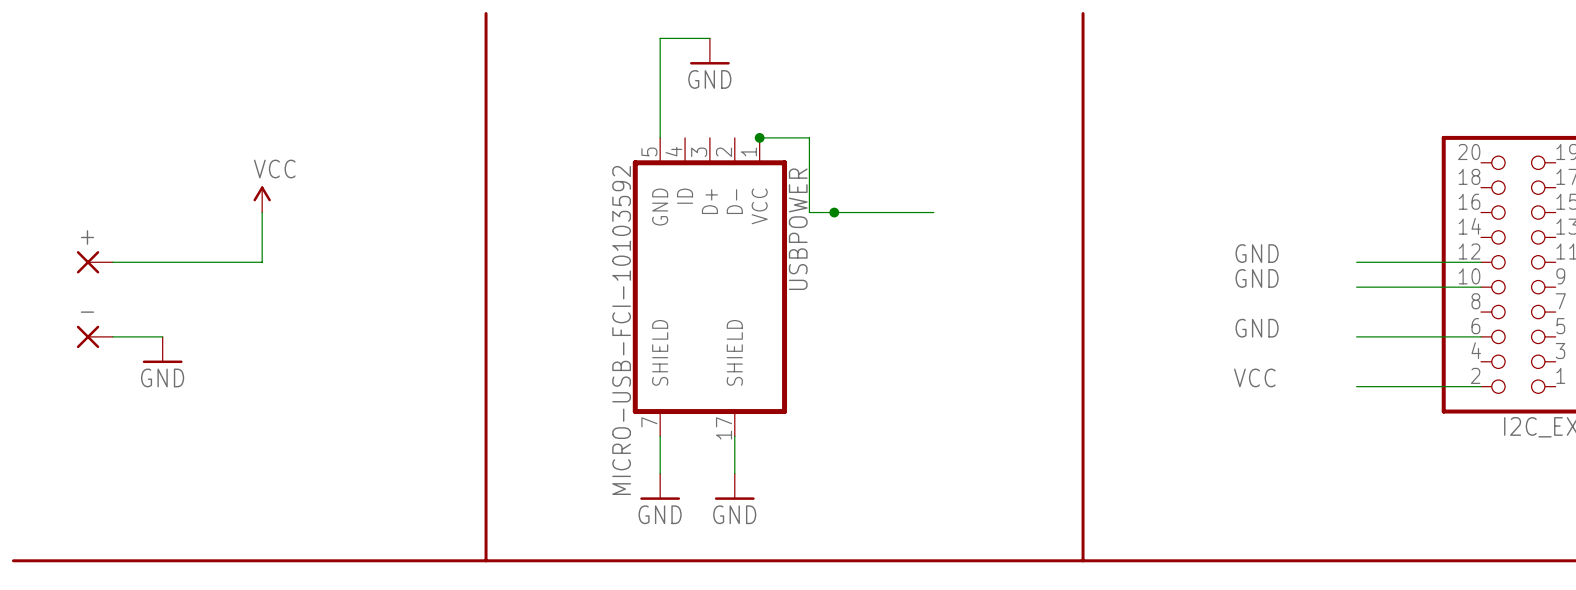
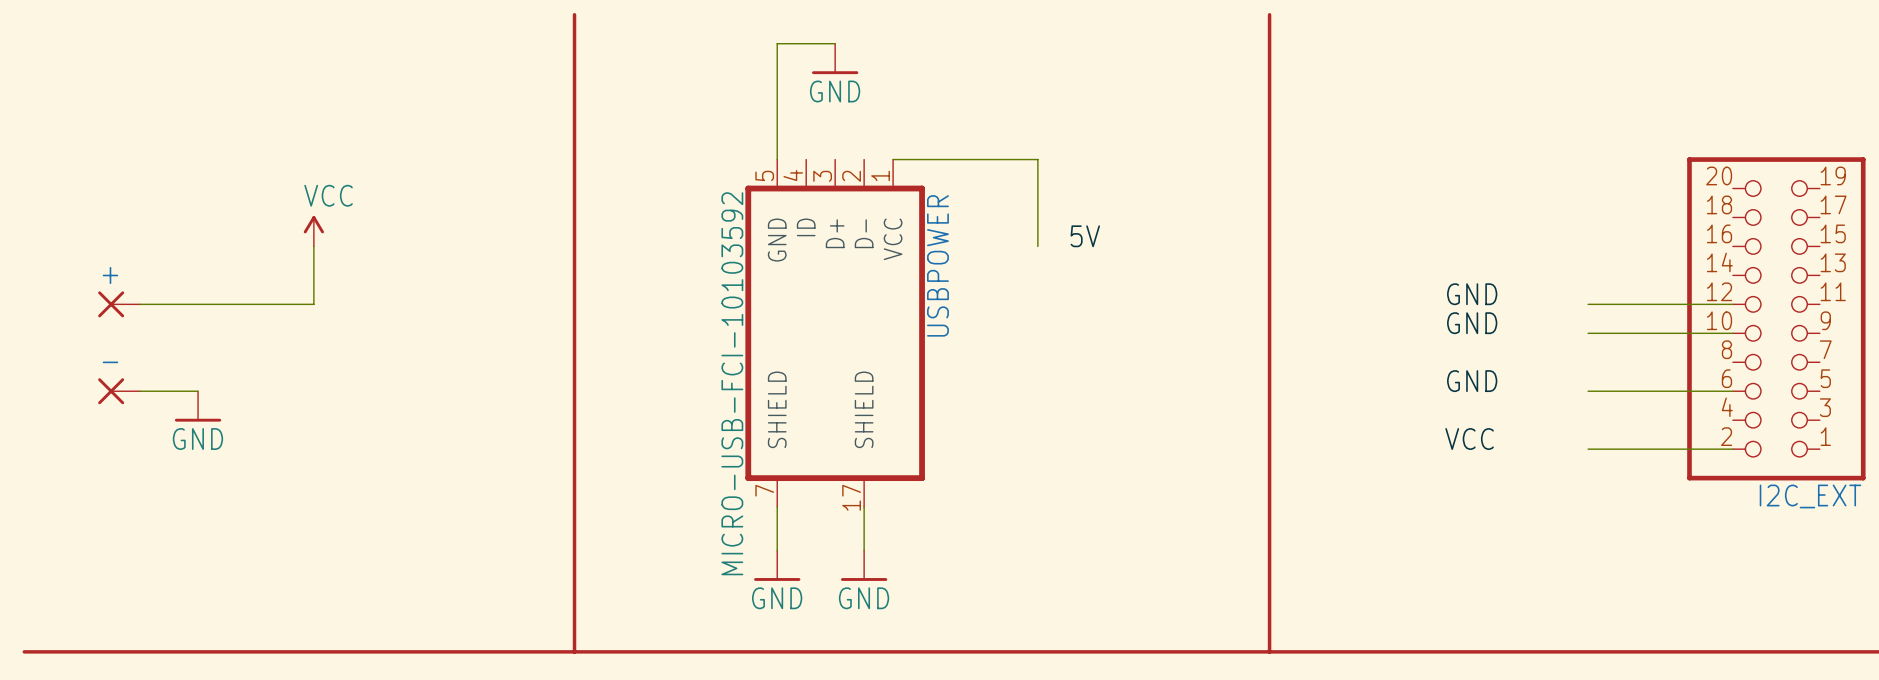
junction: (759, 137) -> none
wire: (809, 137) (809, 212) (933, 212) -> (951, 159) (1037, 159) (1037, 246)
label: none -> 5V (1085, 236)
junction: (834, 212) -> none

